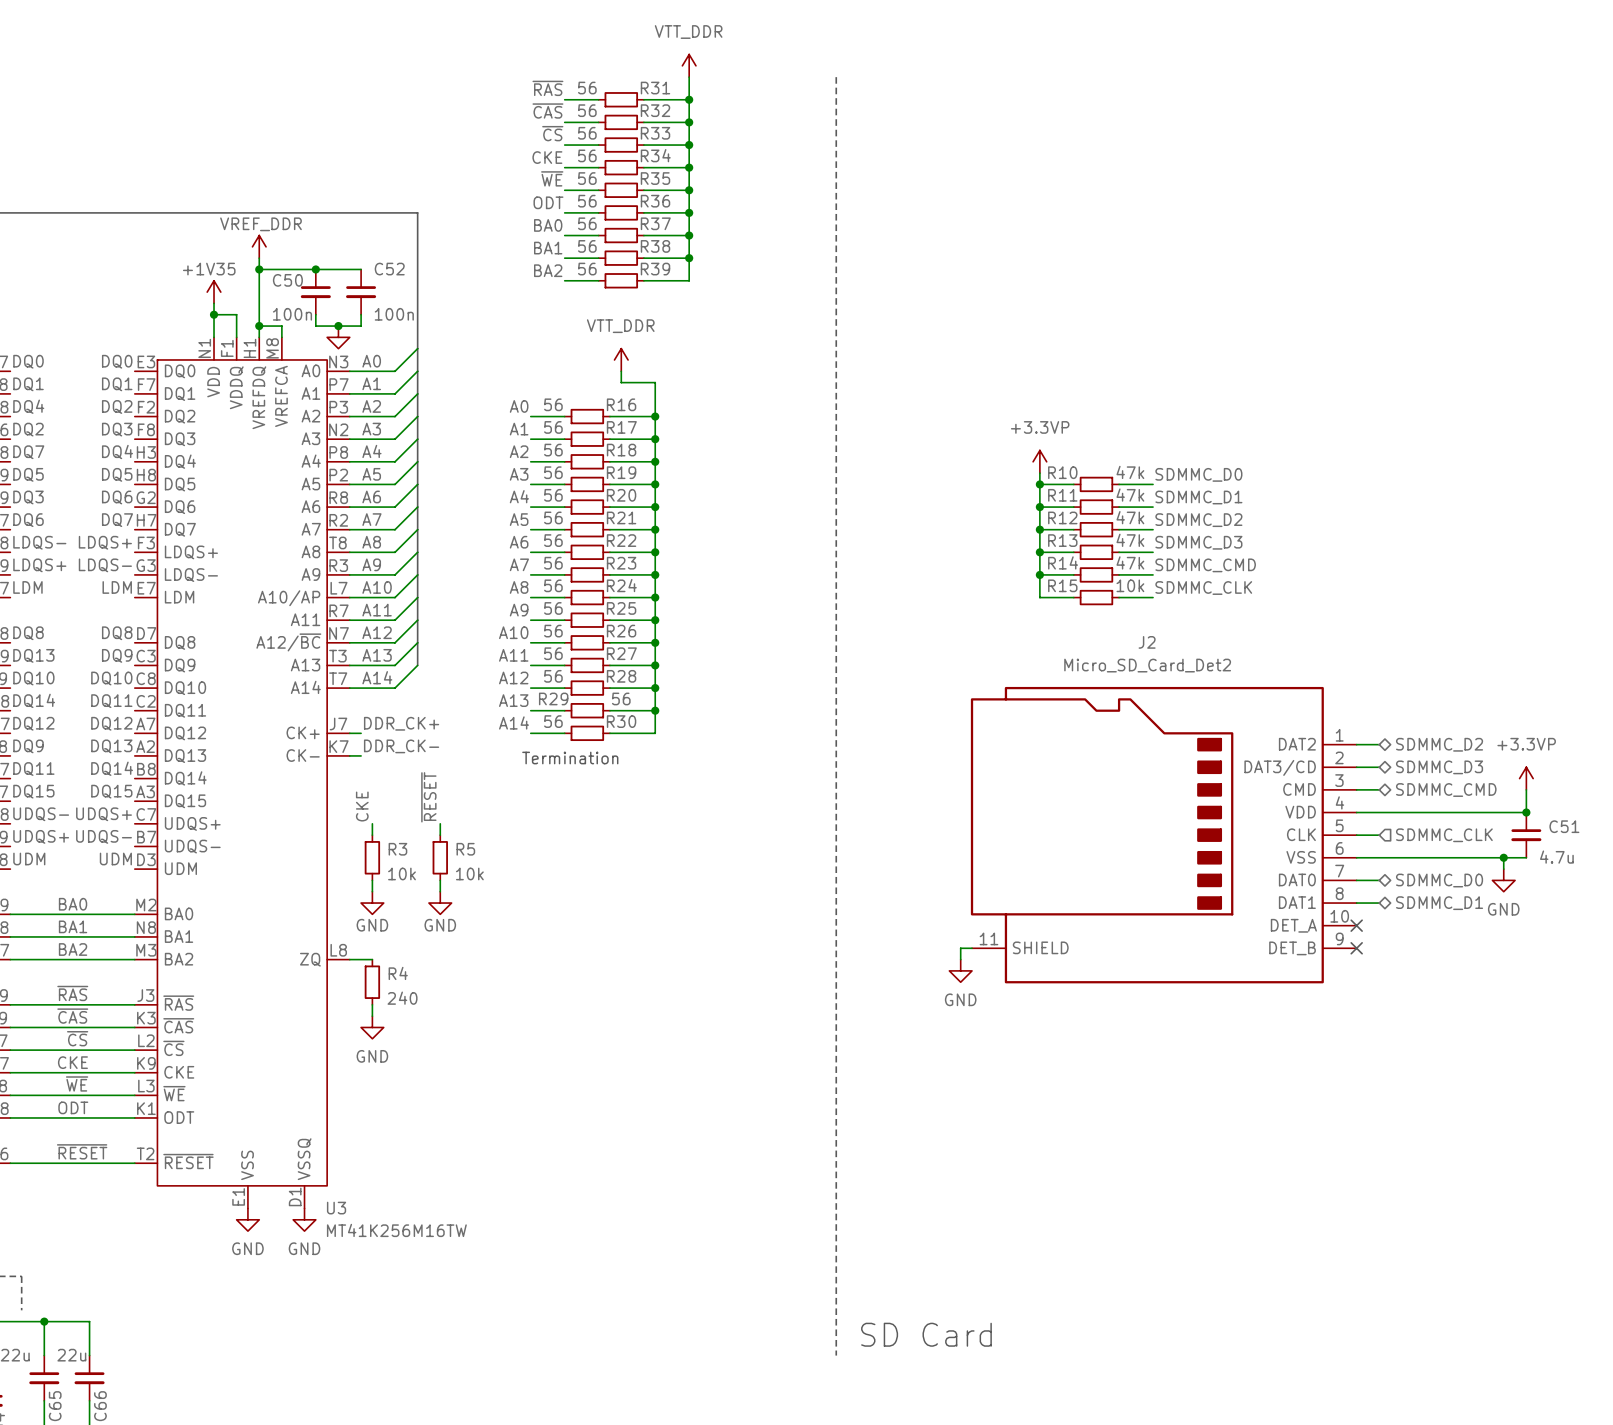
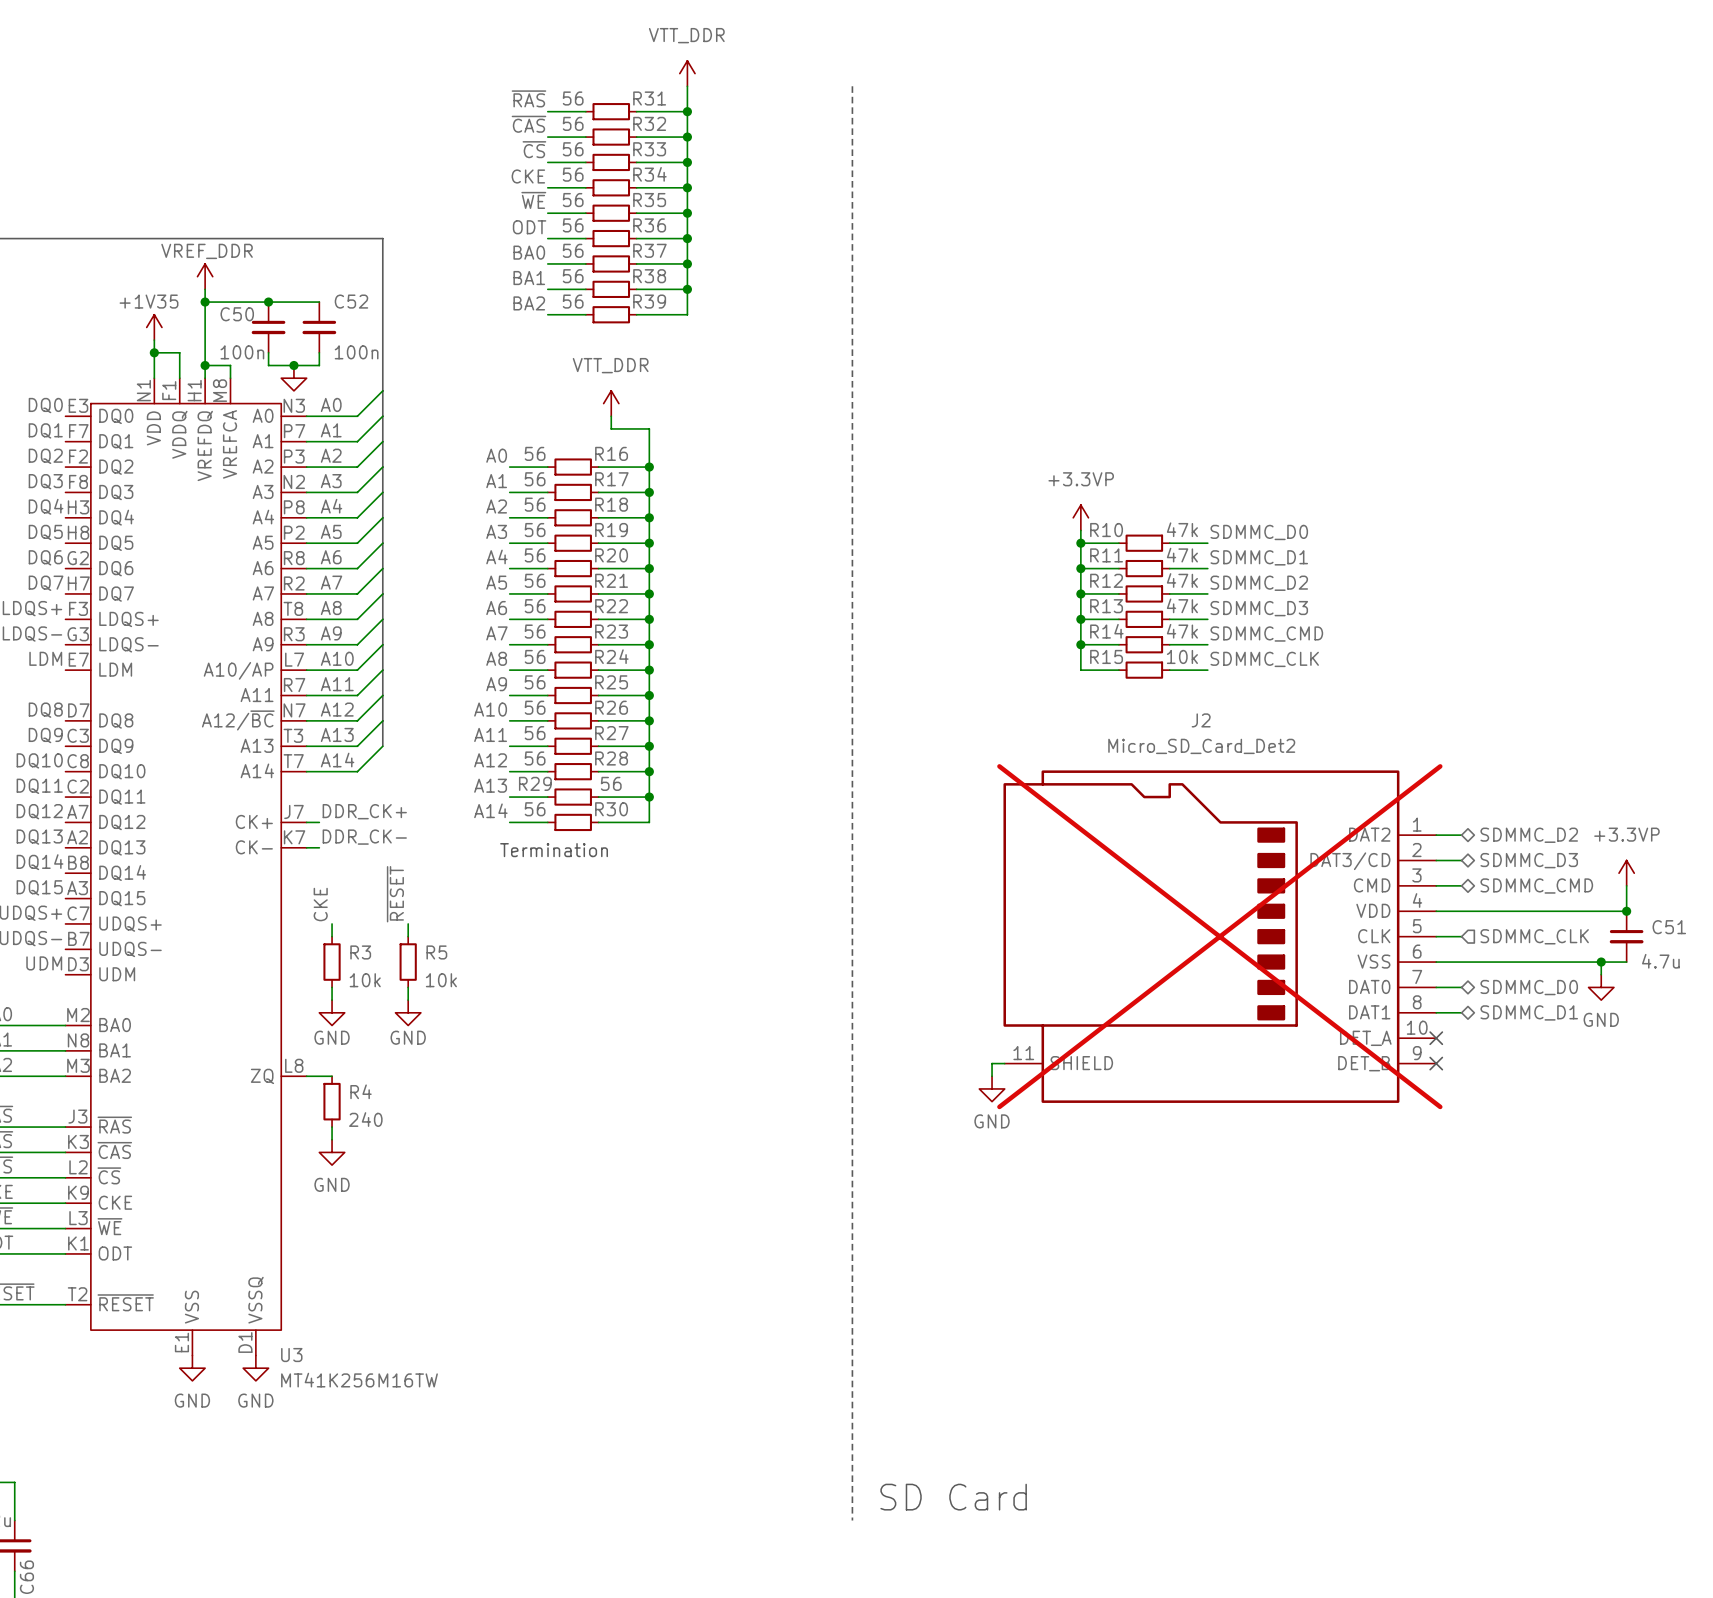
J2 do-not-place cross: none -> (1219, 936)

